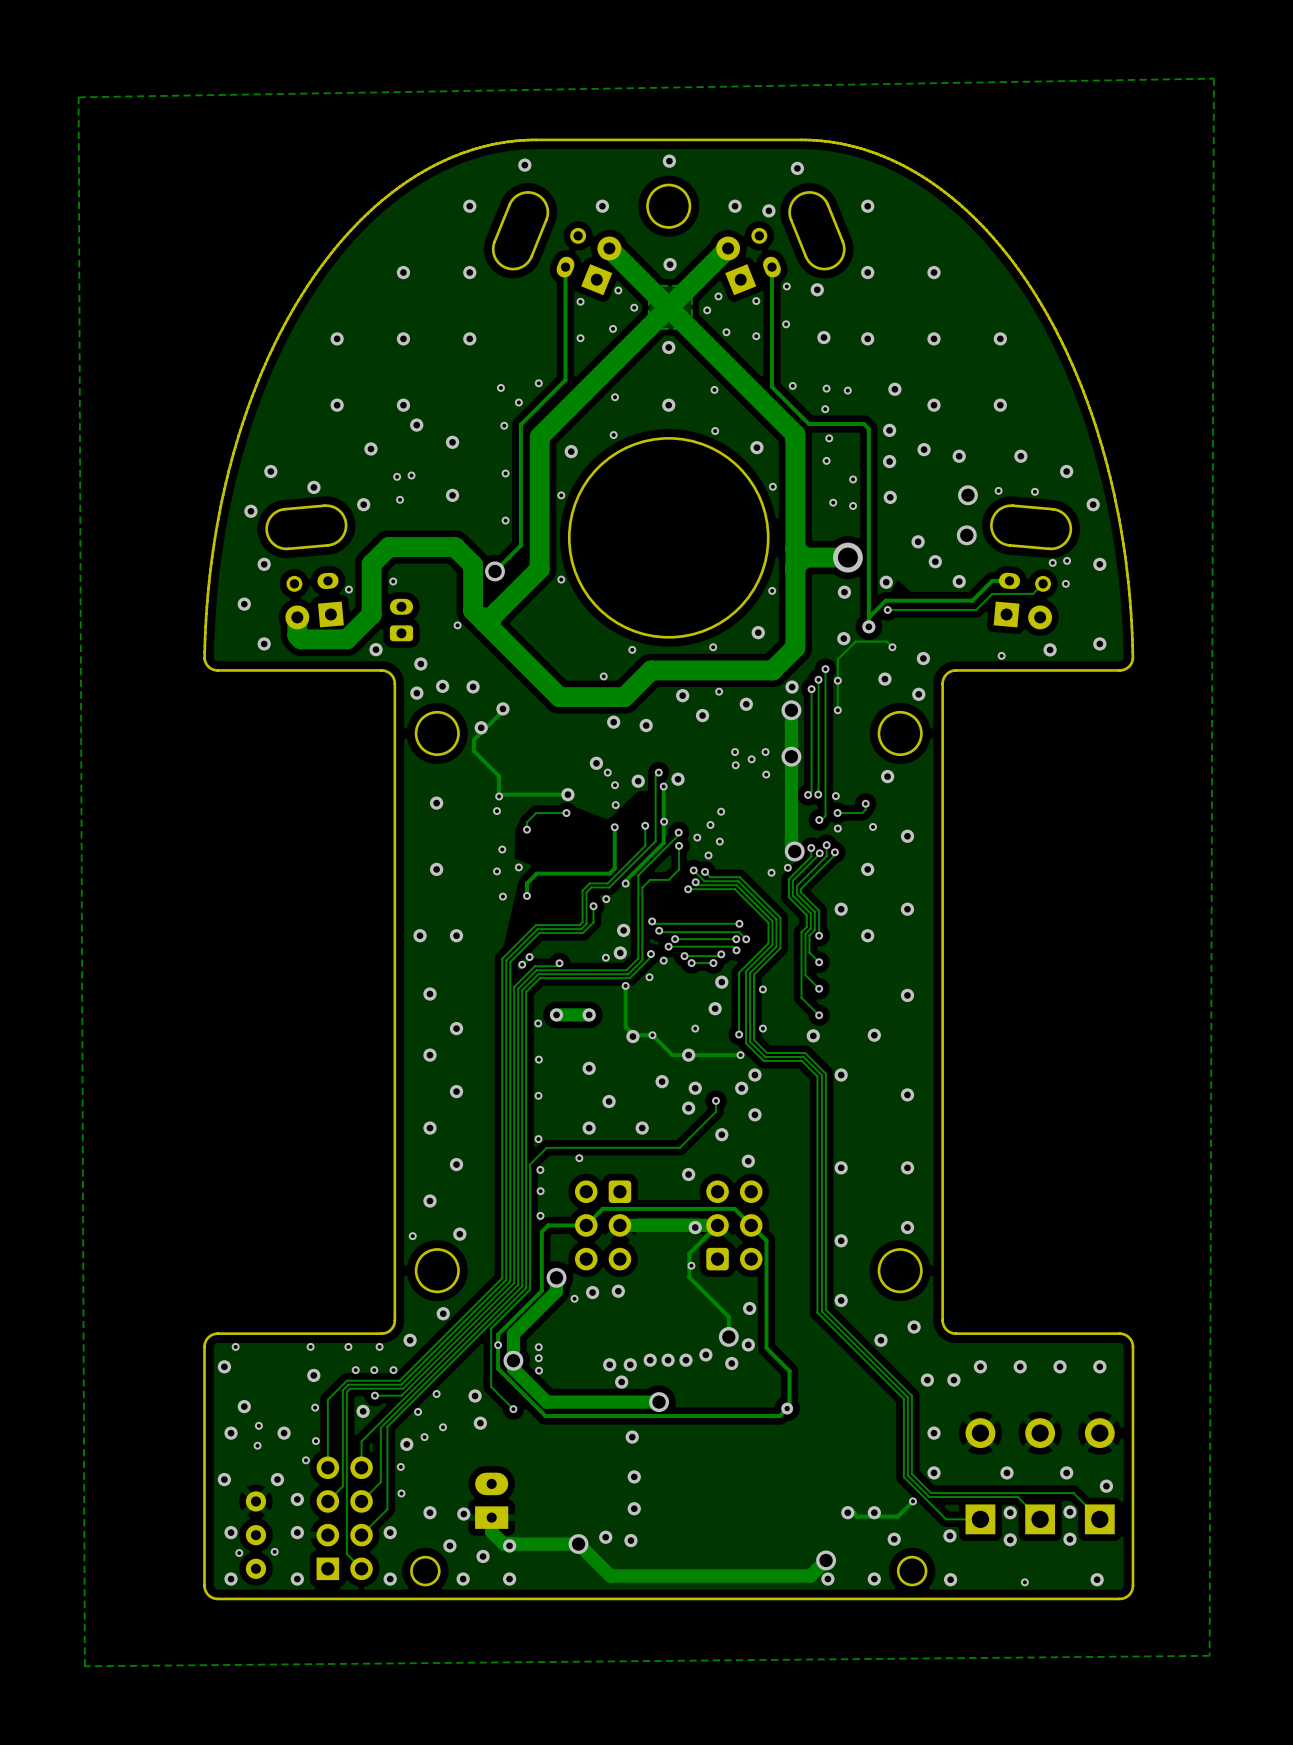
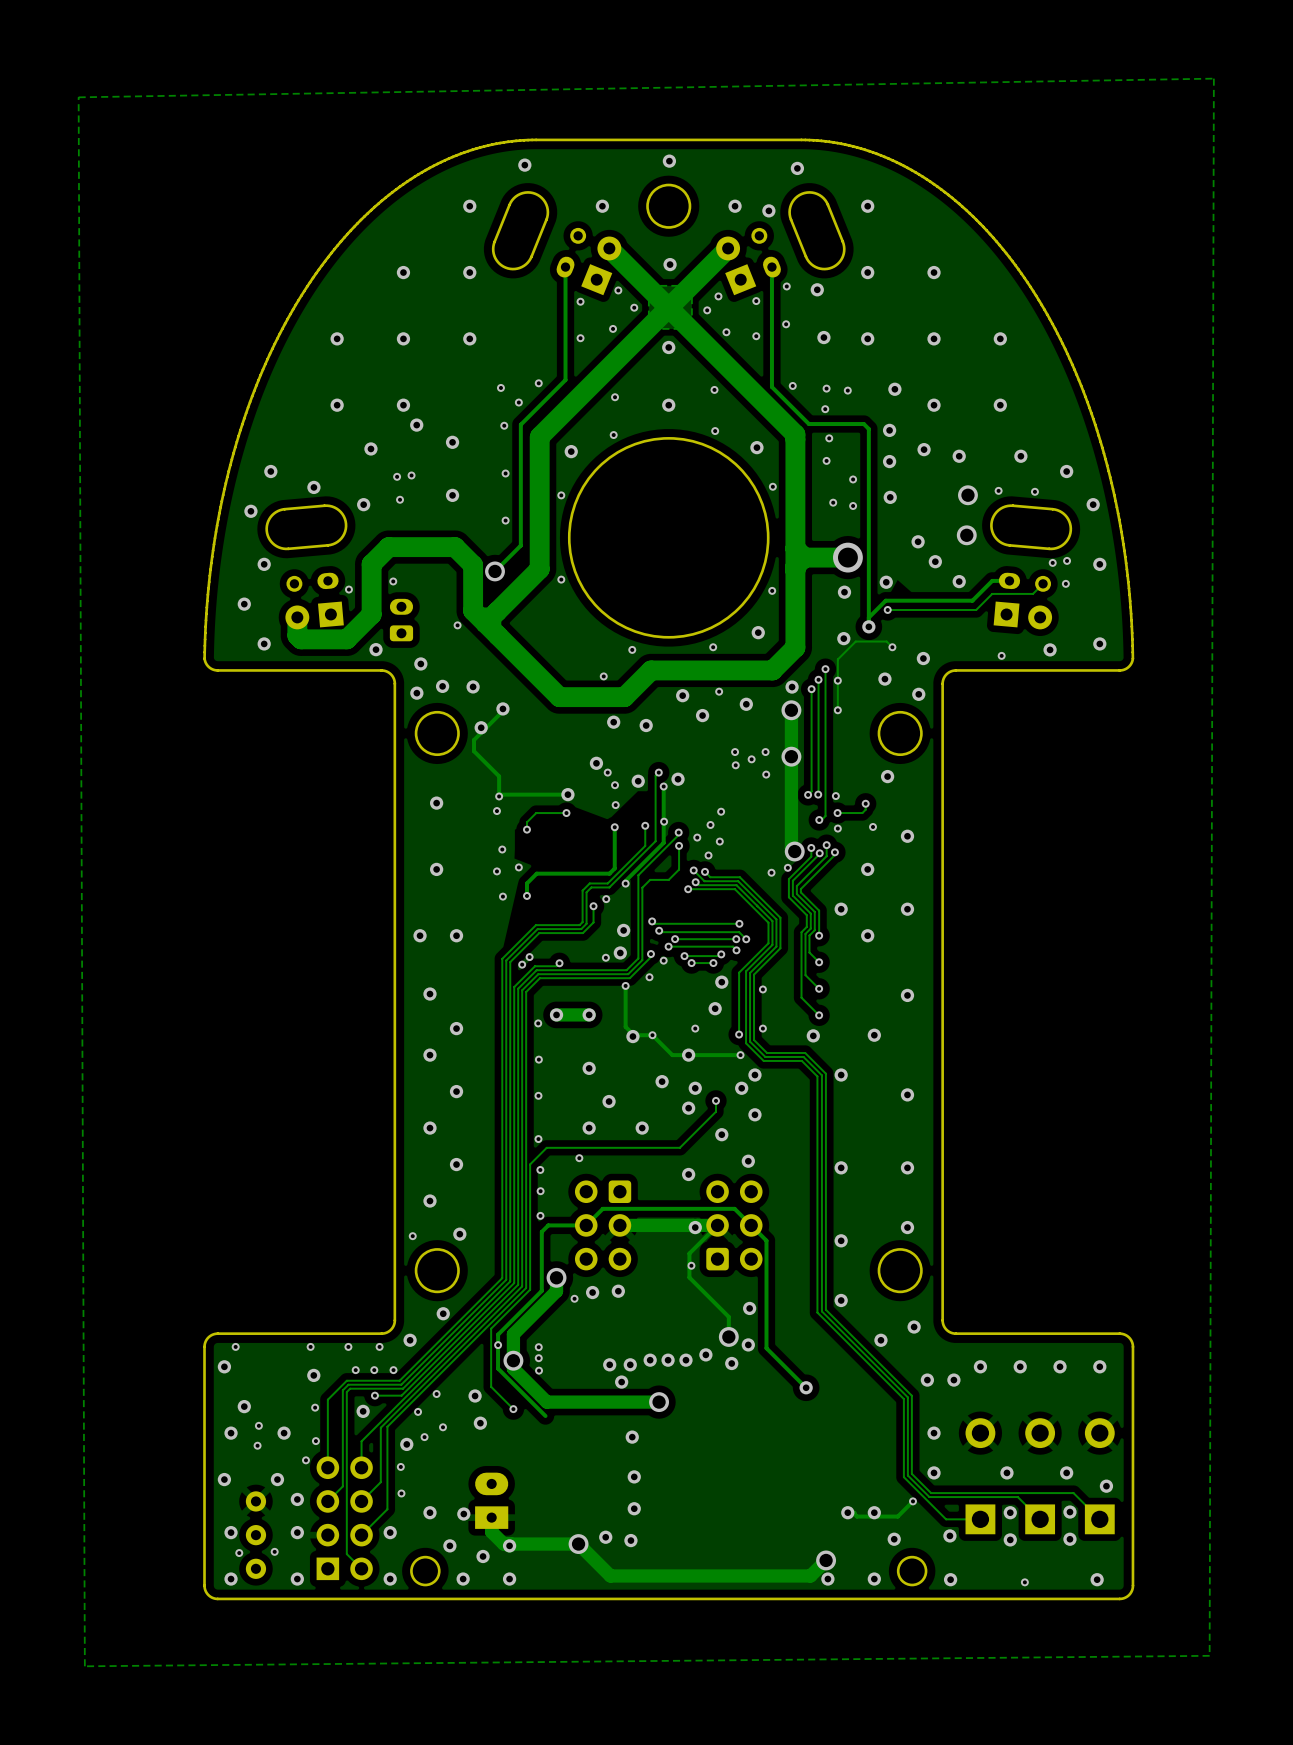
track: (766, 1348) (789, 1371) (789, 1406) (779, 1416) (545, 1416) -> (766, 1348) (806, 1387)
via: none -> (806, 1387)
via: (787, 1408) -> none

